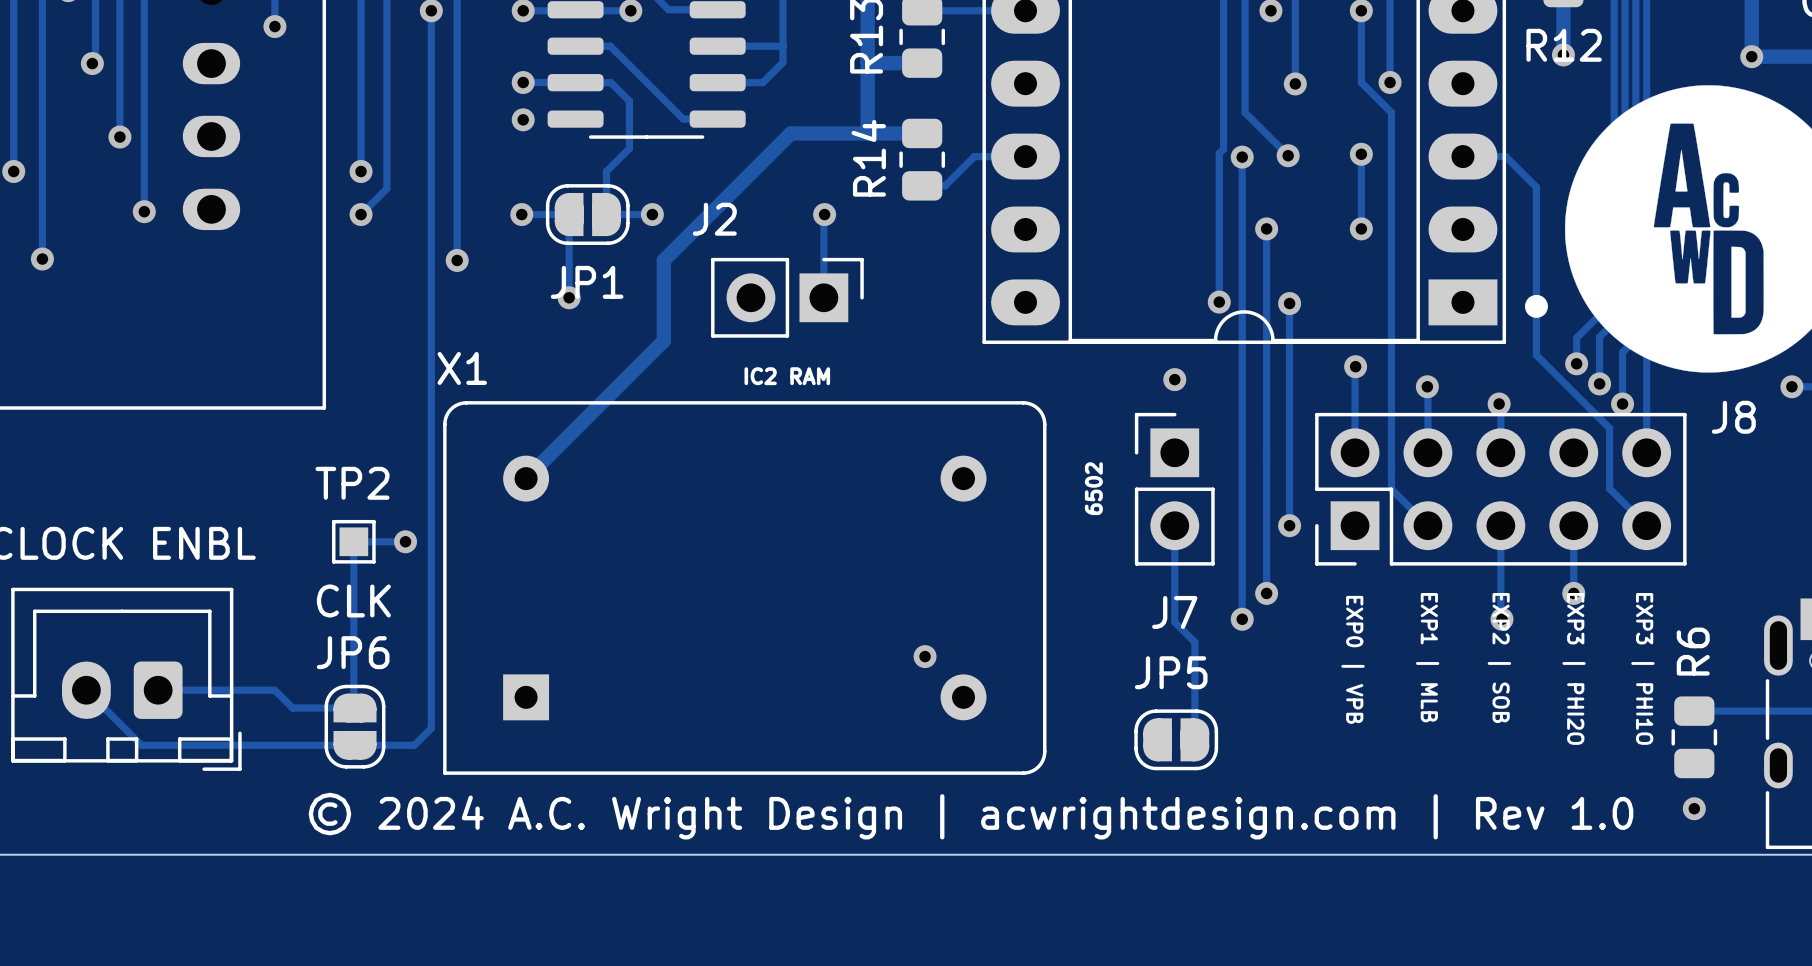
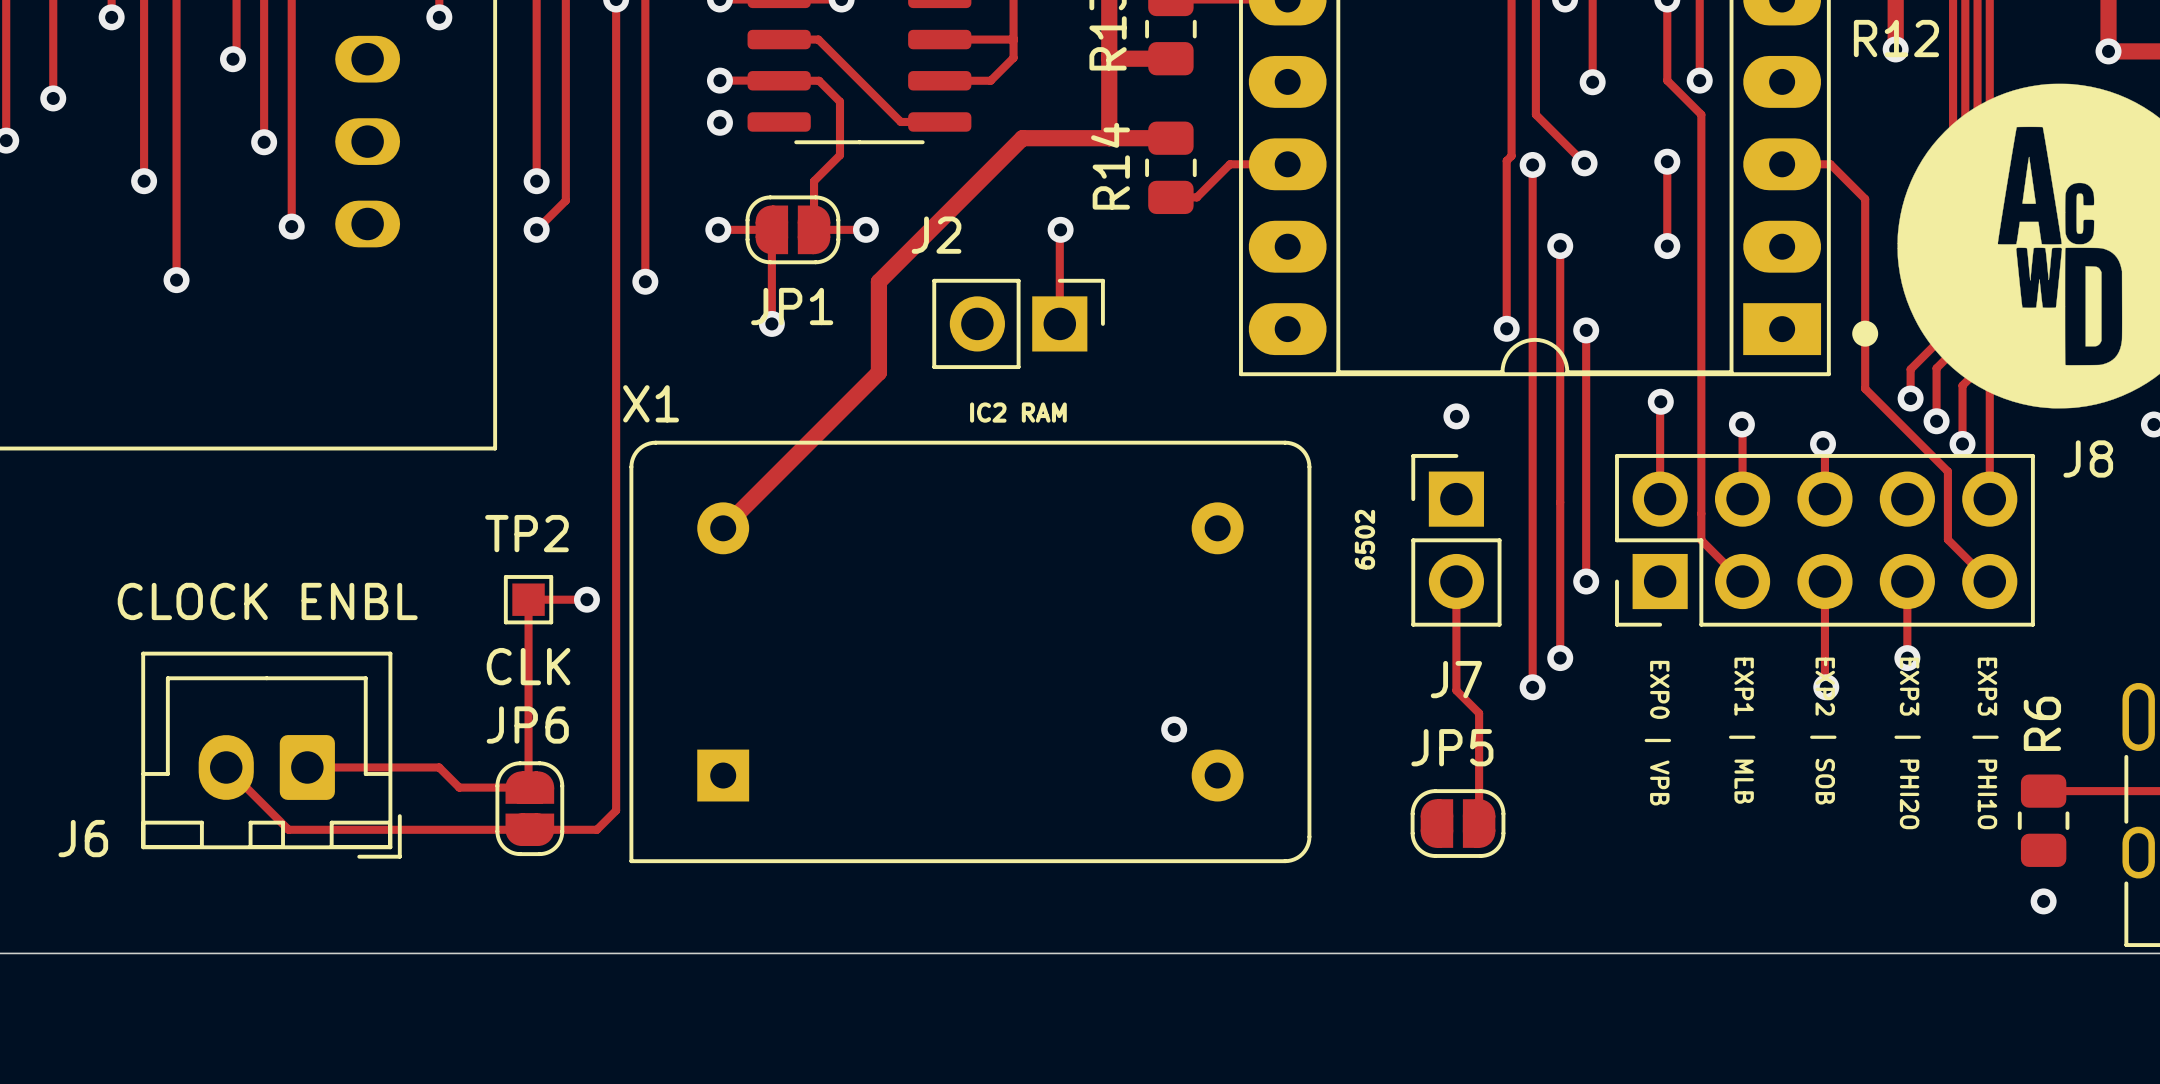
text: © 2024 A.C. Wright Design | acwrightdesign.com | Rev 1.0 (970, 816) -> none

